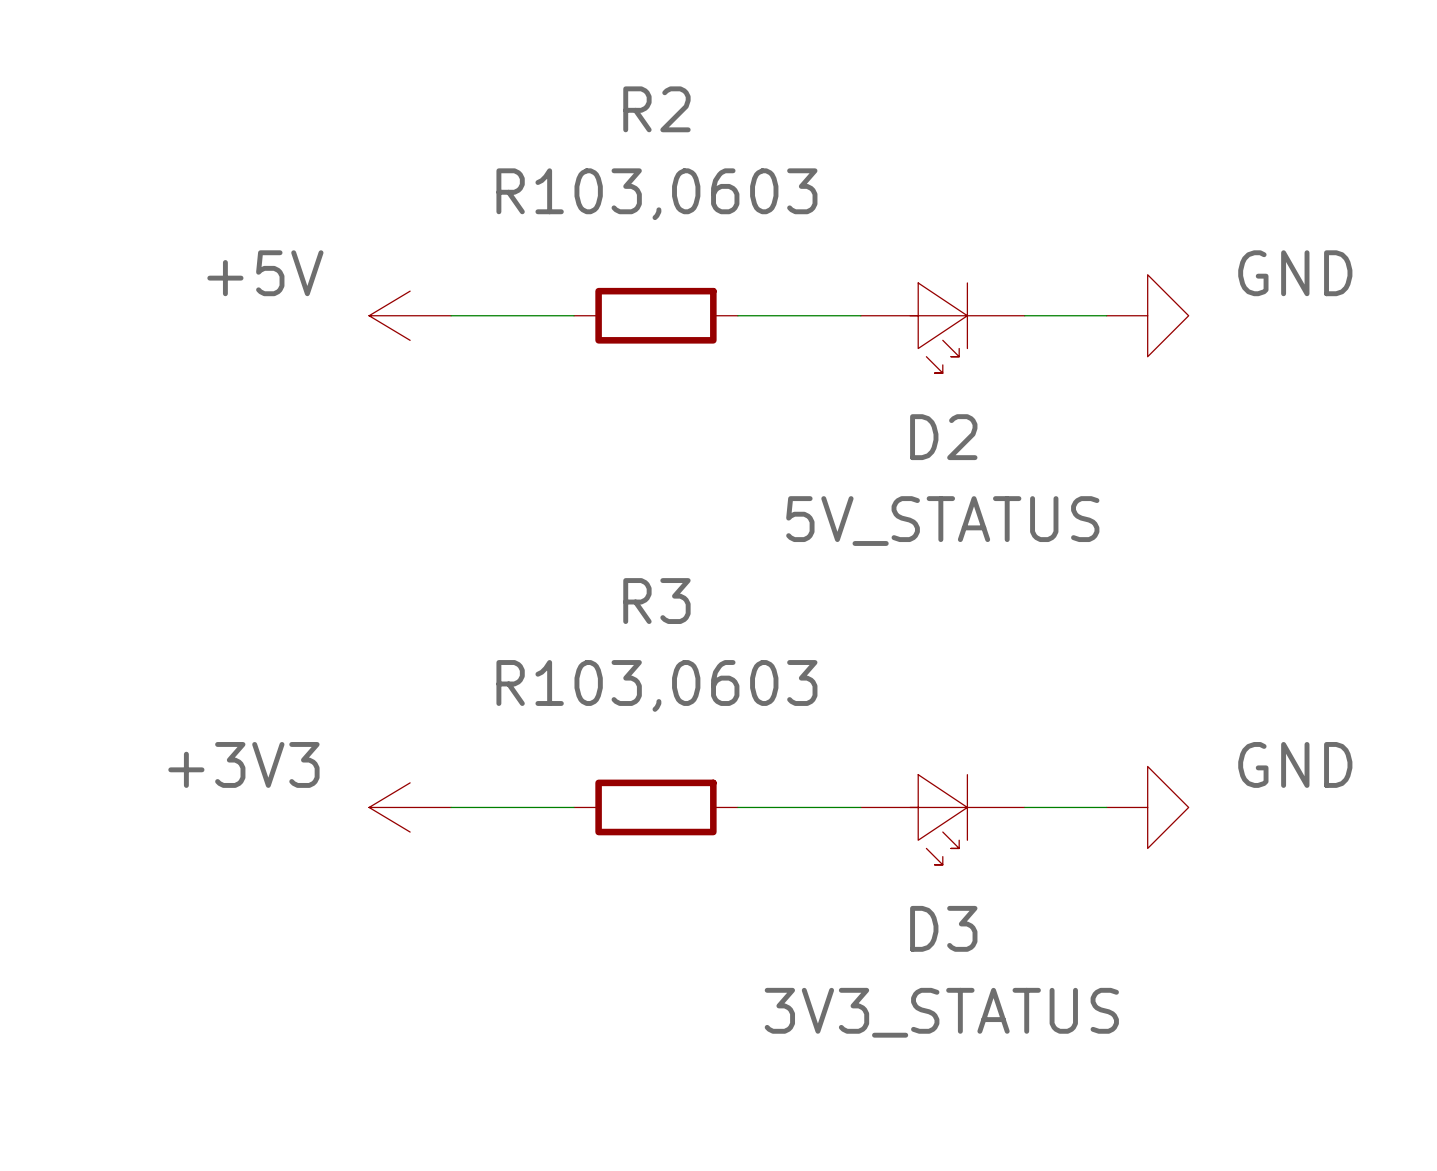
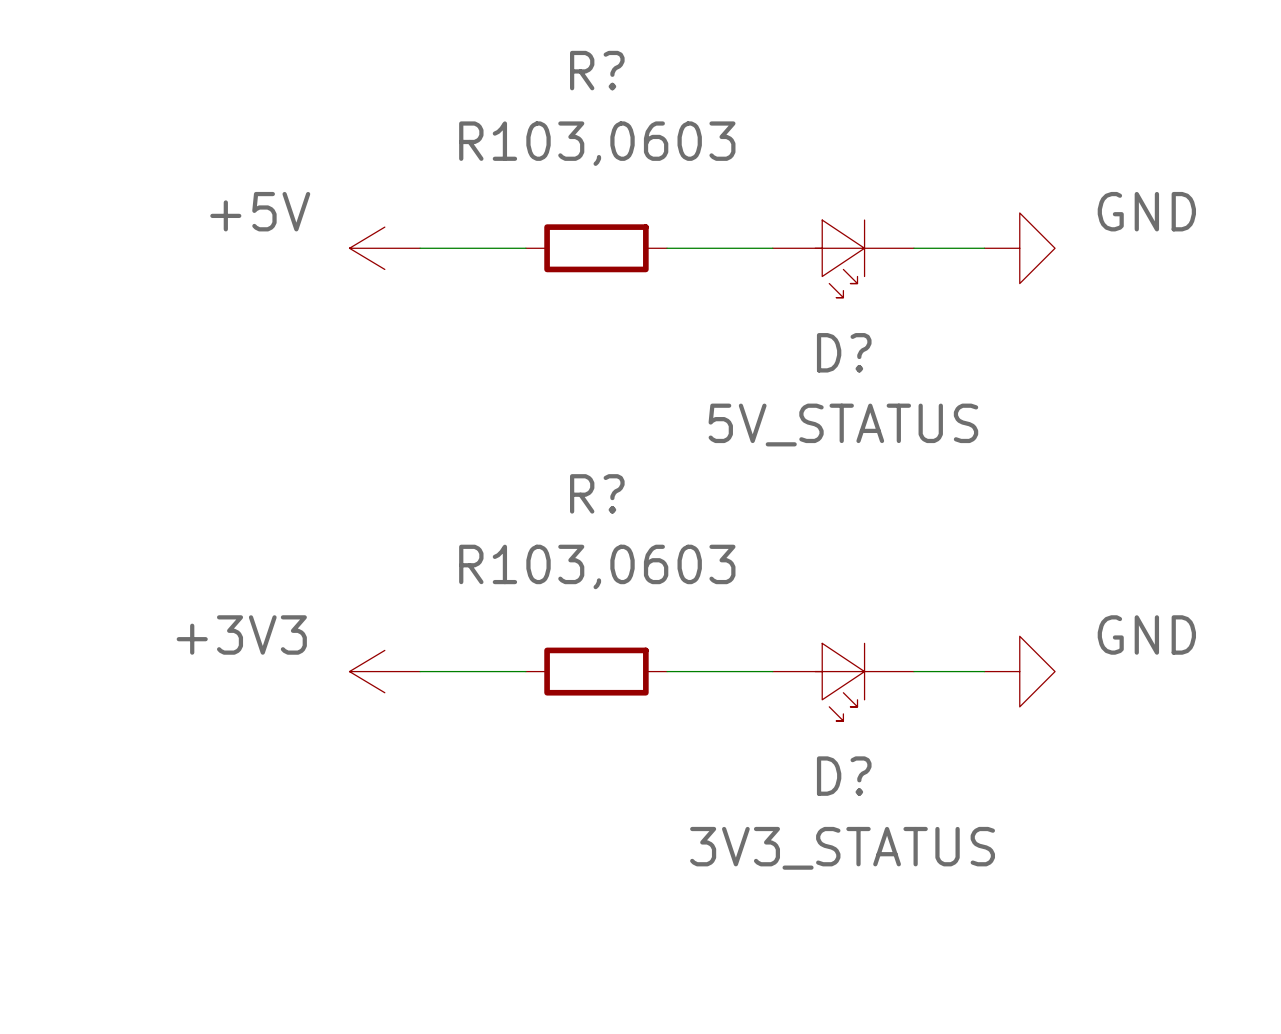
R2 name: R2 (656, 109) -> R? (597, 70)
D2 name: D2 (943, 437) -> D? (844, 352)
R3 name: R3 (656, 601) -> R? (597, 493)
D3 name: D3 (943, 928) -> D? (844, 776)

